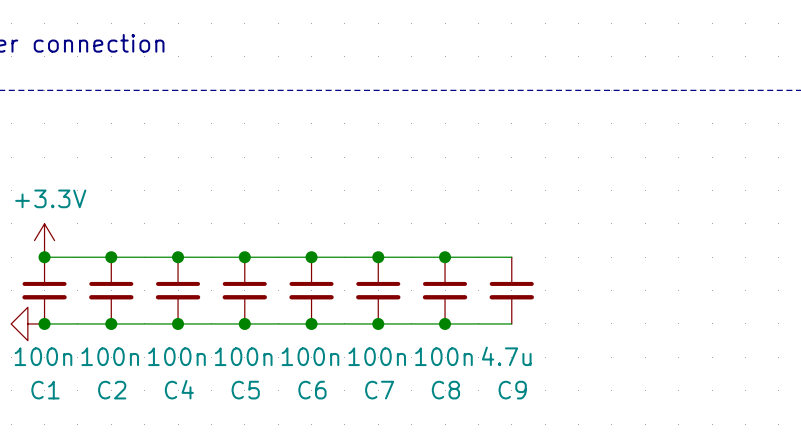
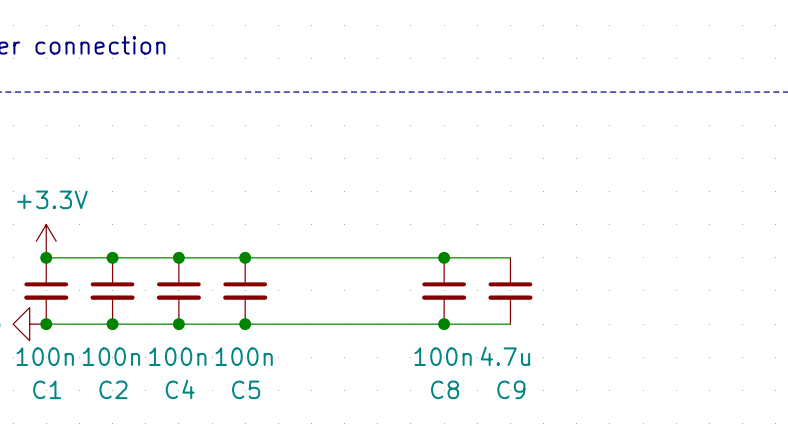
junction: (311, 257) -> none
junction: (378, 257) -> none
C6: 100n (311, 290) -> none
C7: 100n (378, 290) -> none
junction: (311, 323) -> none
junction: (378, 323) -> none

